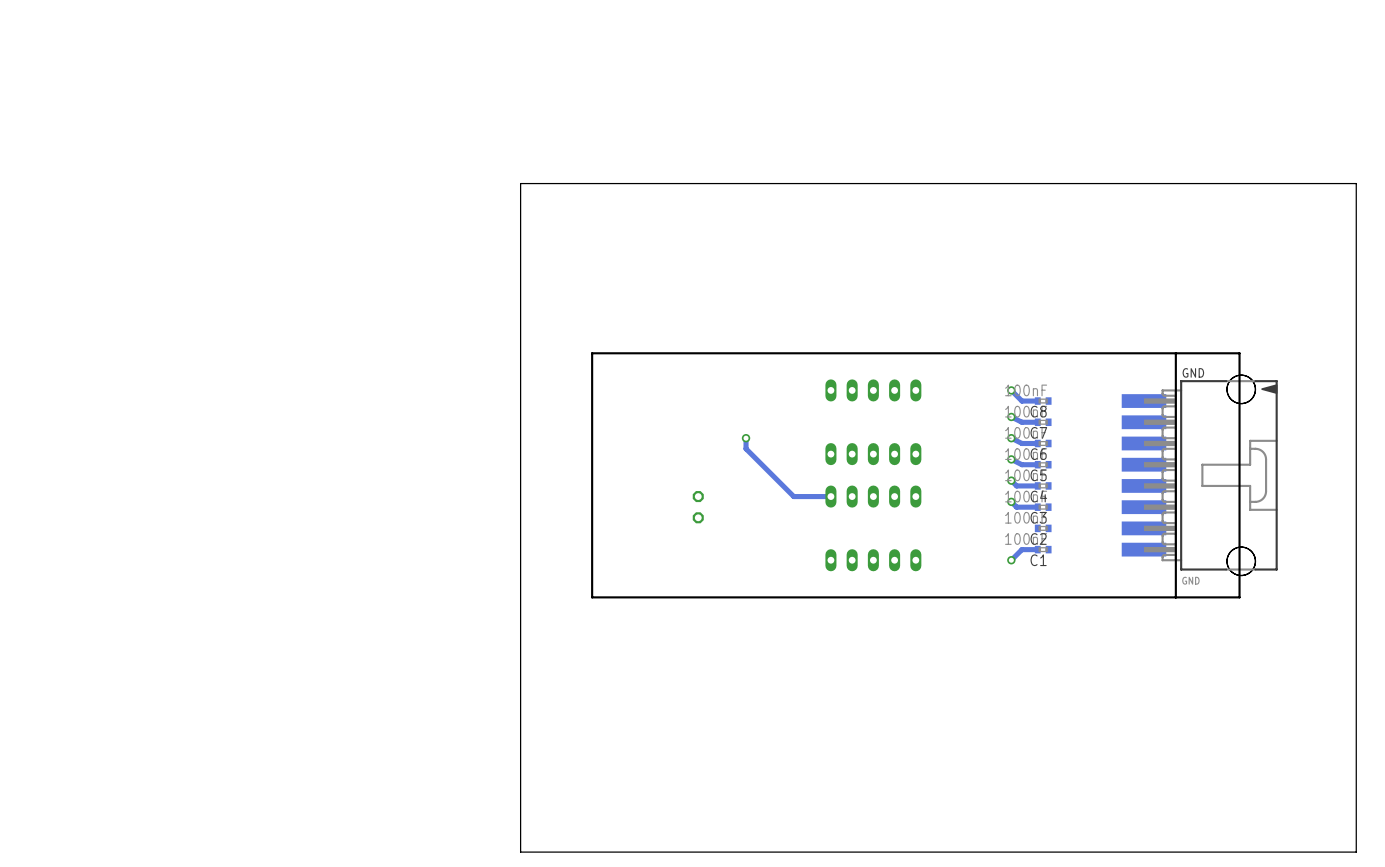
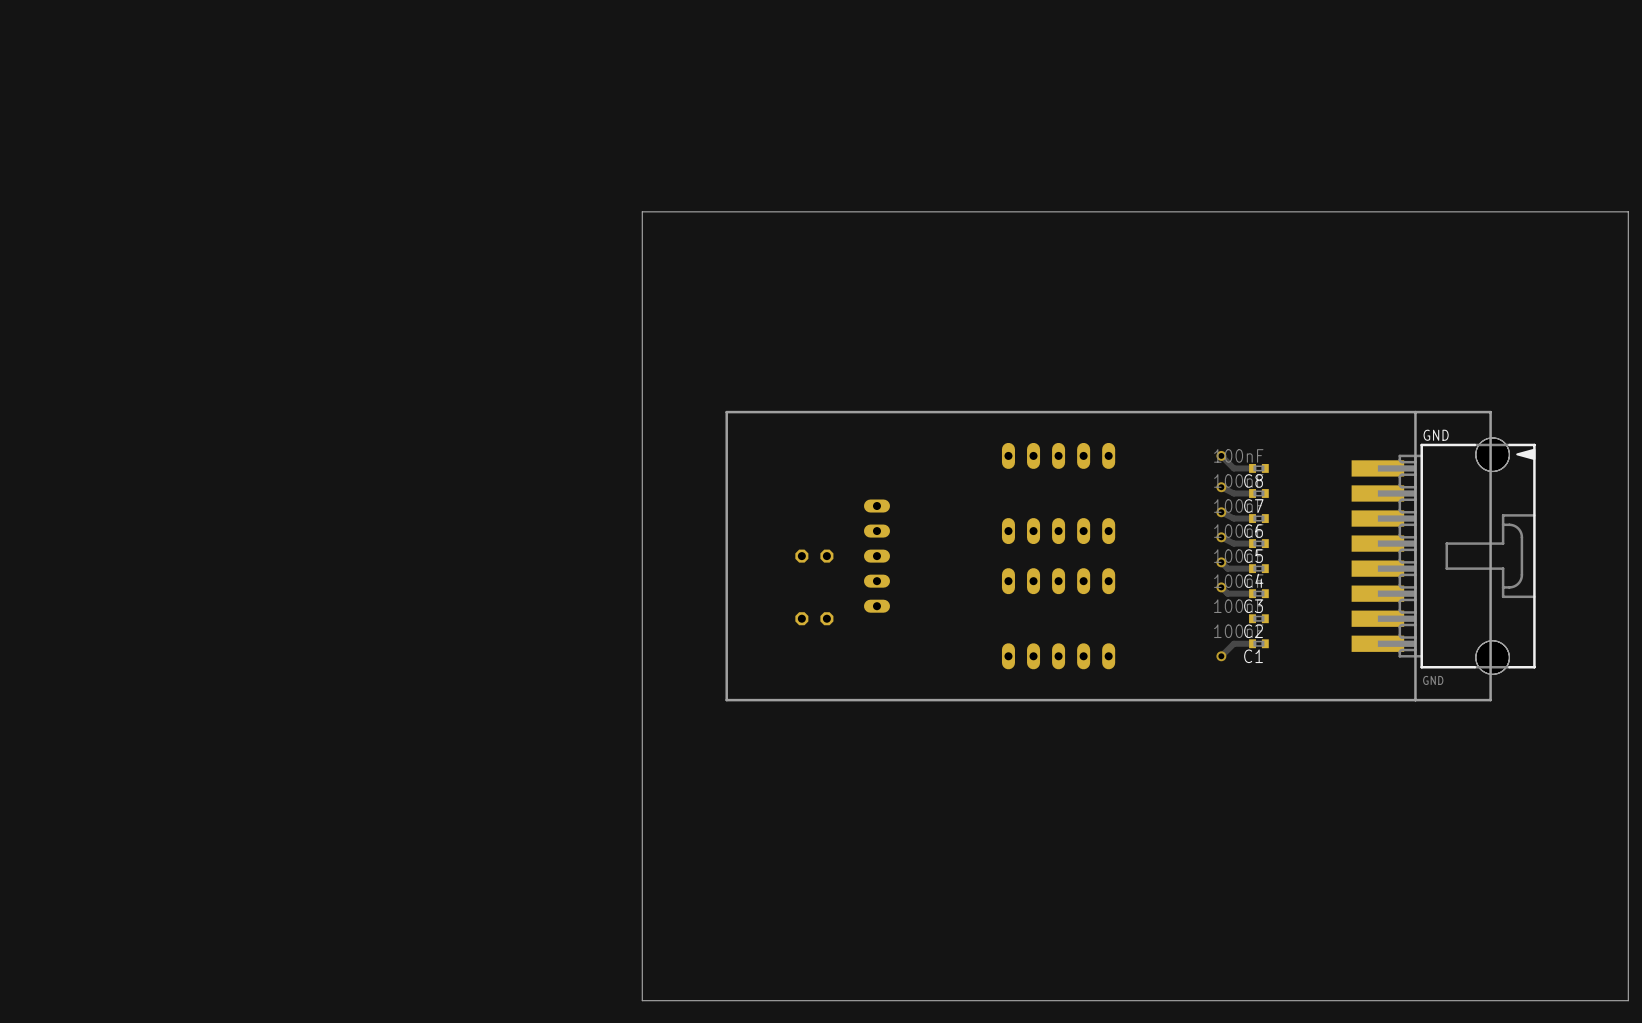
track: (746, 438) (746, 448) (793, 496) (830, 496) -> none
via: (746, 438) -> none
part: none -> (814, 556)
part: none -> (876, 556)
part: (698, 507) -> none
part: none -> (814, 618)

